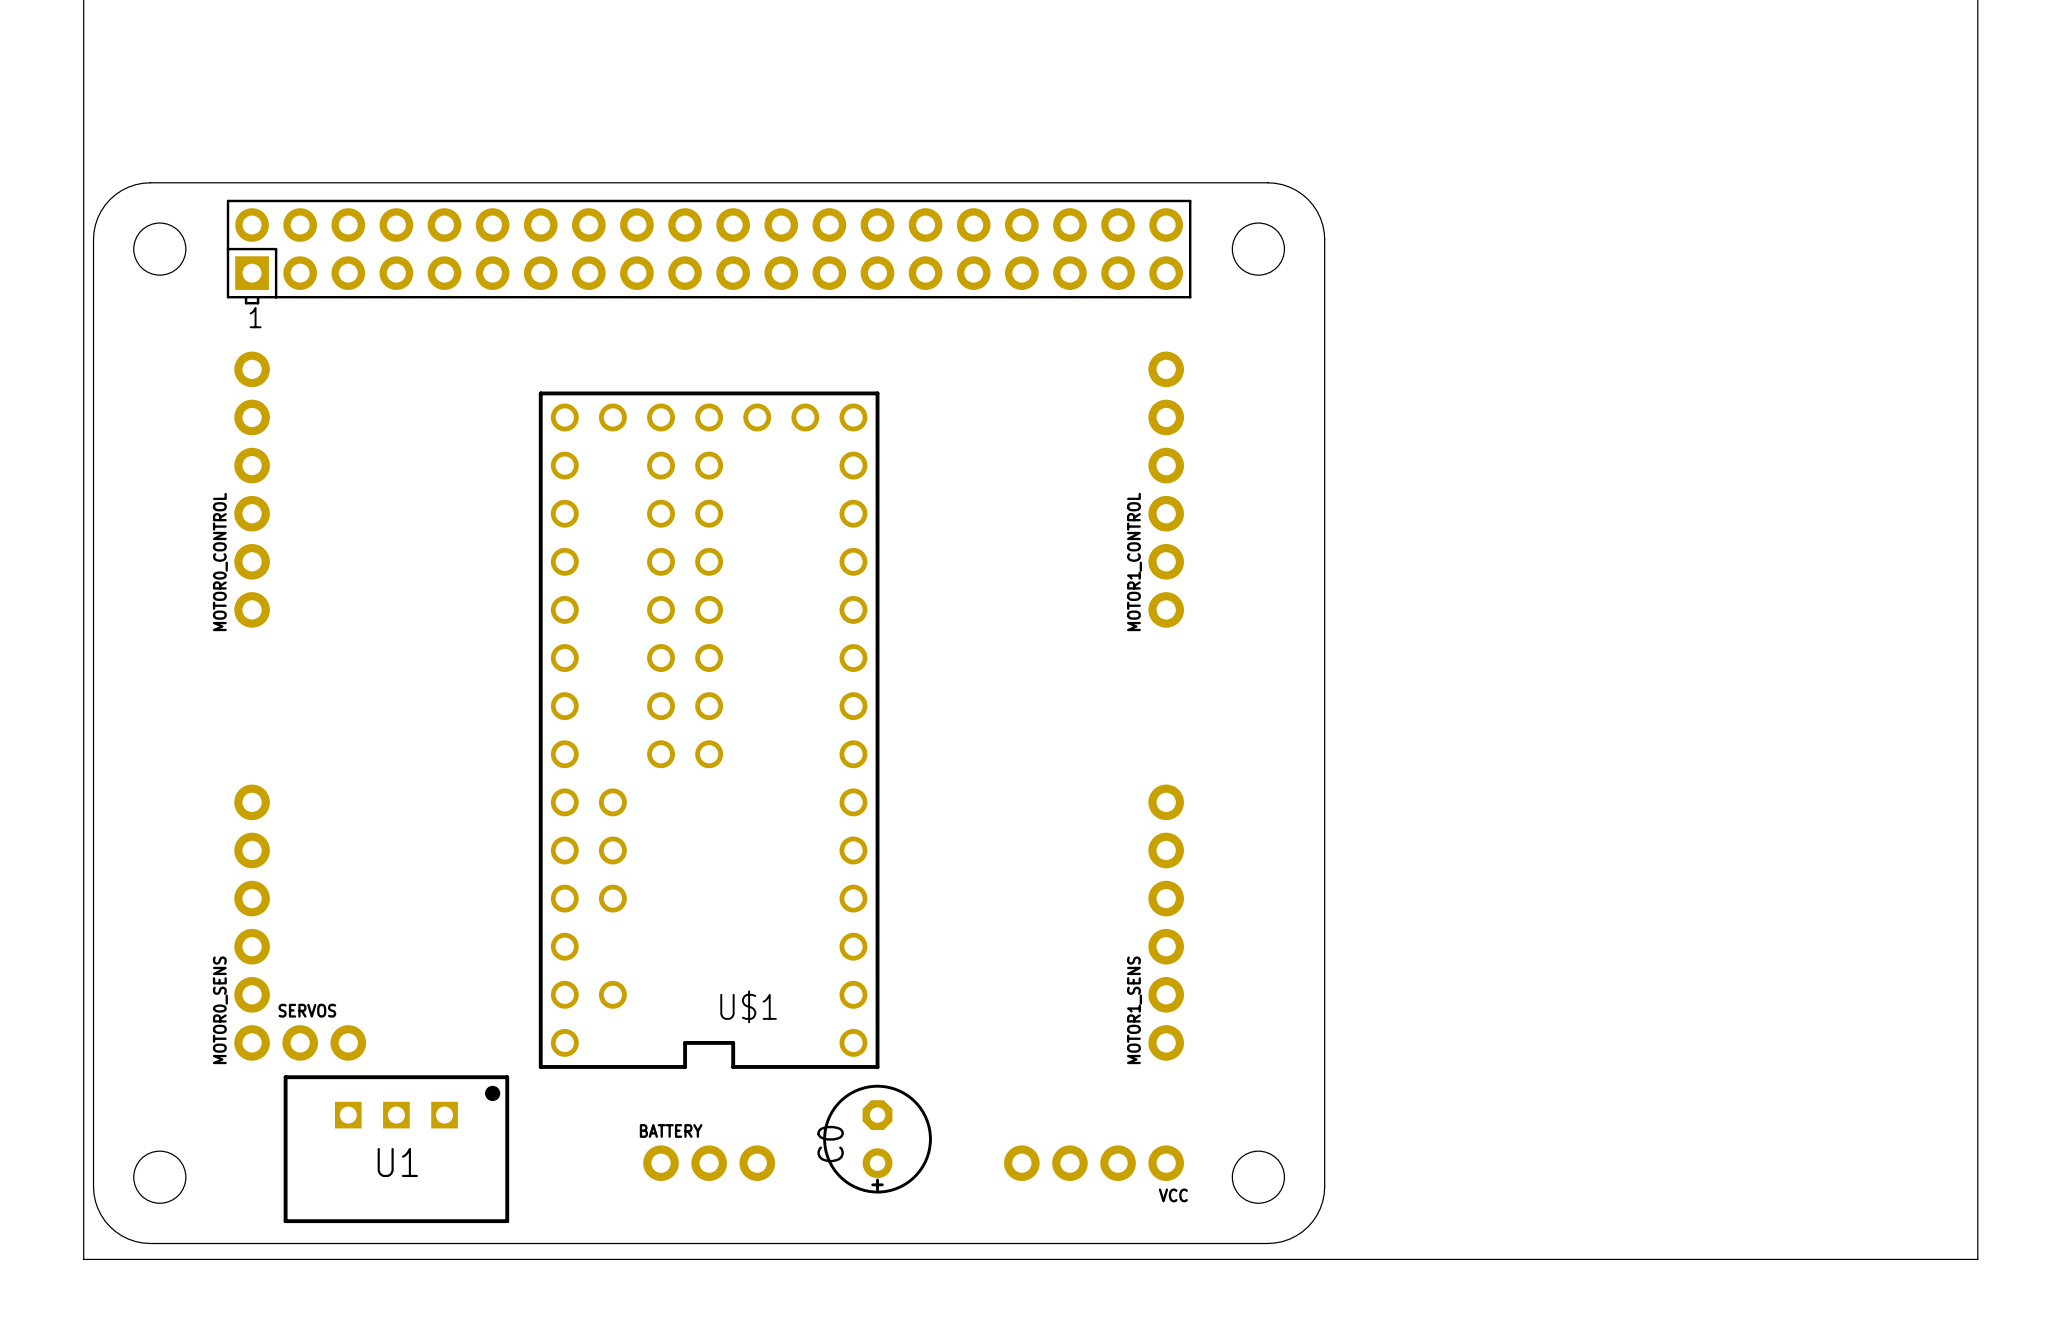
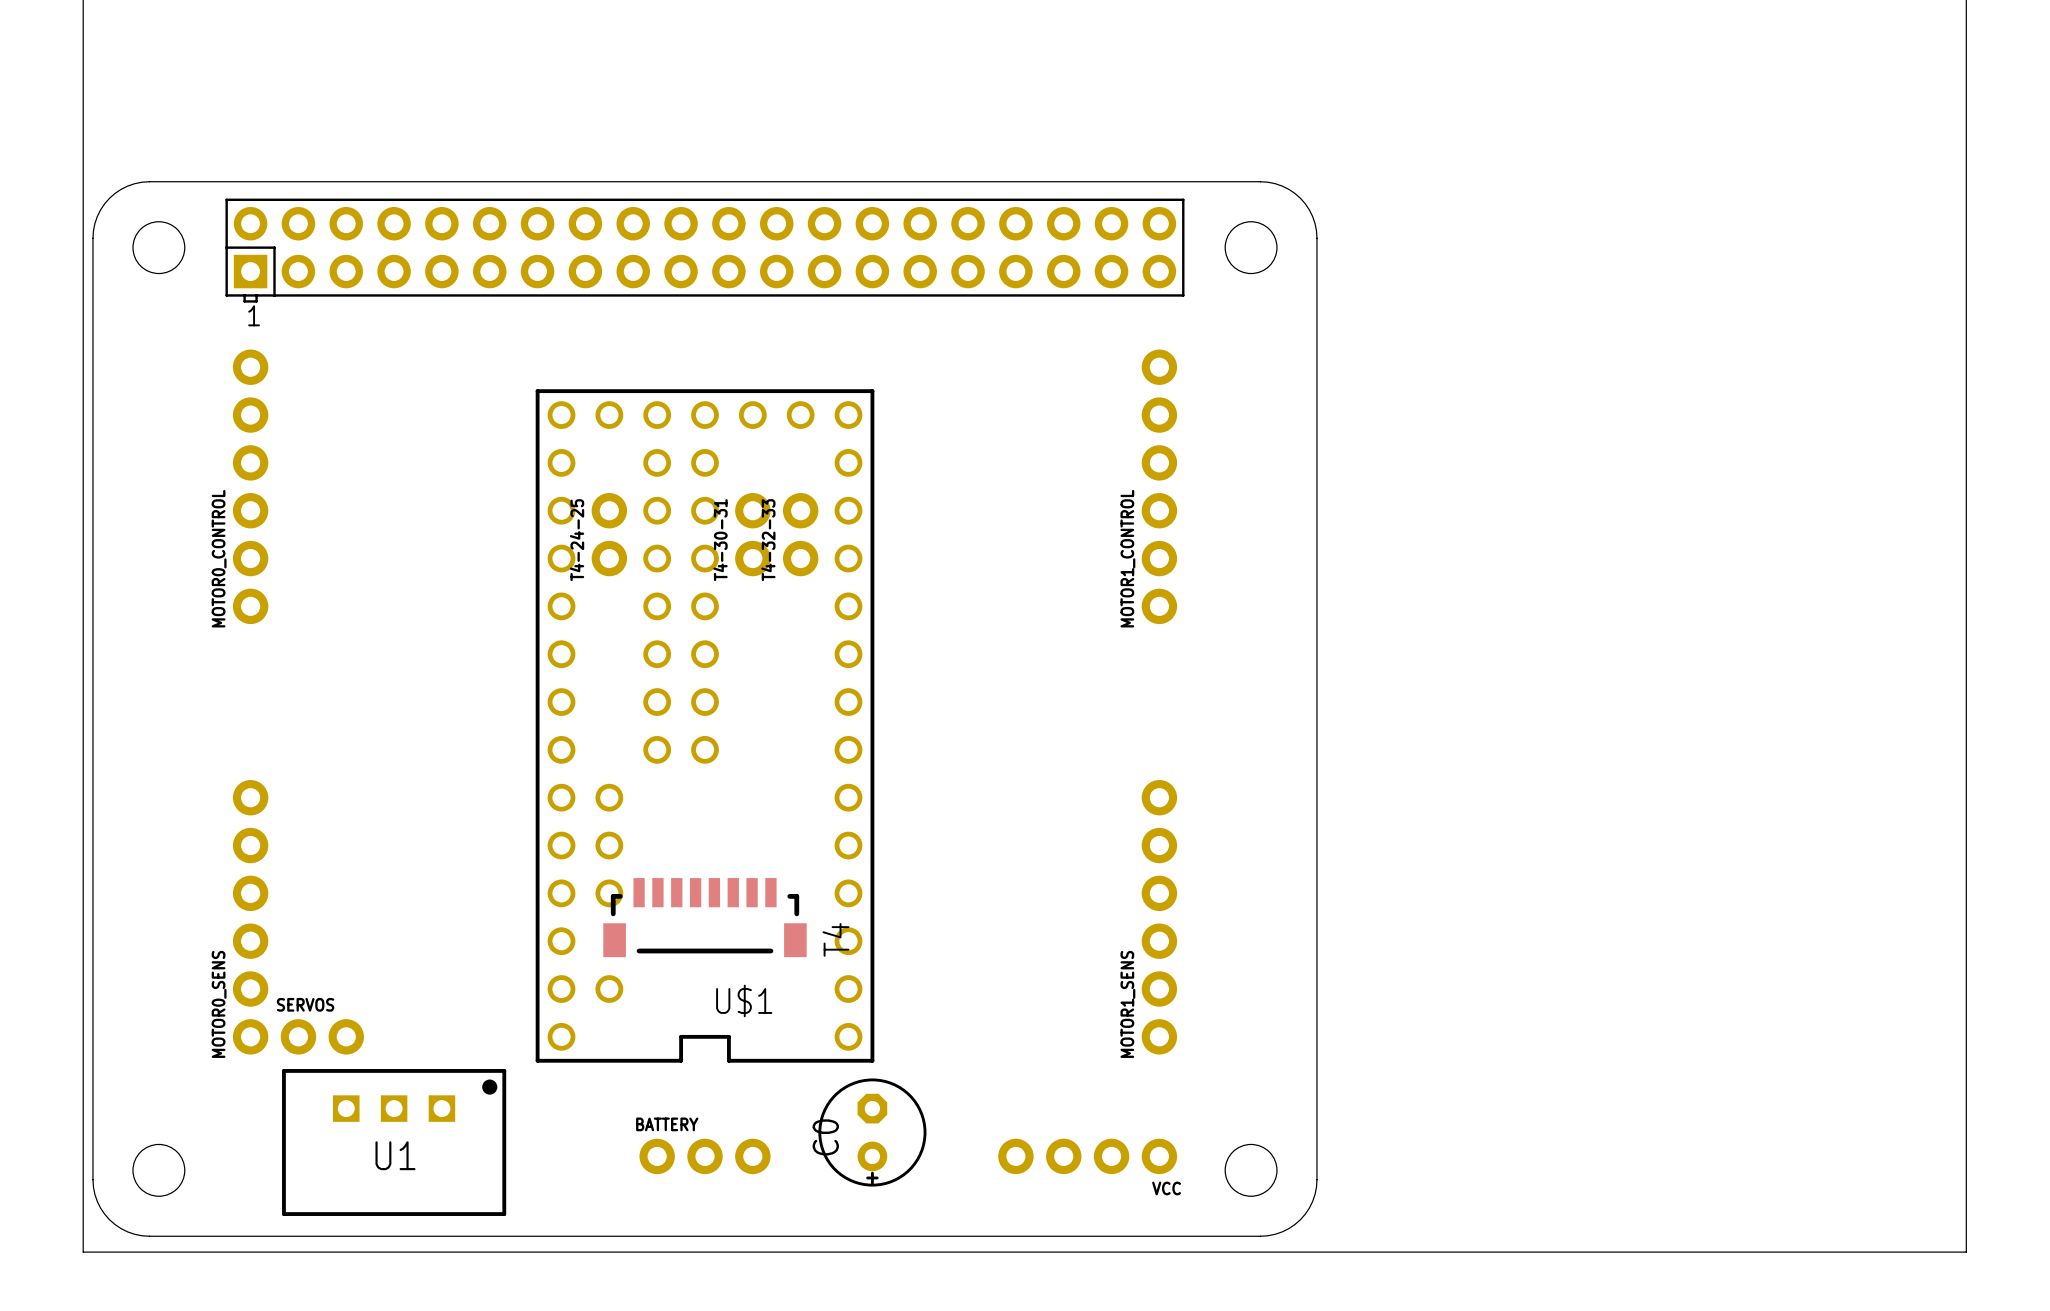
T4-24-25: none -> (609, 534)
T4-30-31: none -> (752, 534)
T4-32-33: none -> (800, 534)
T4: none -> (705, 917)

